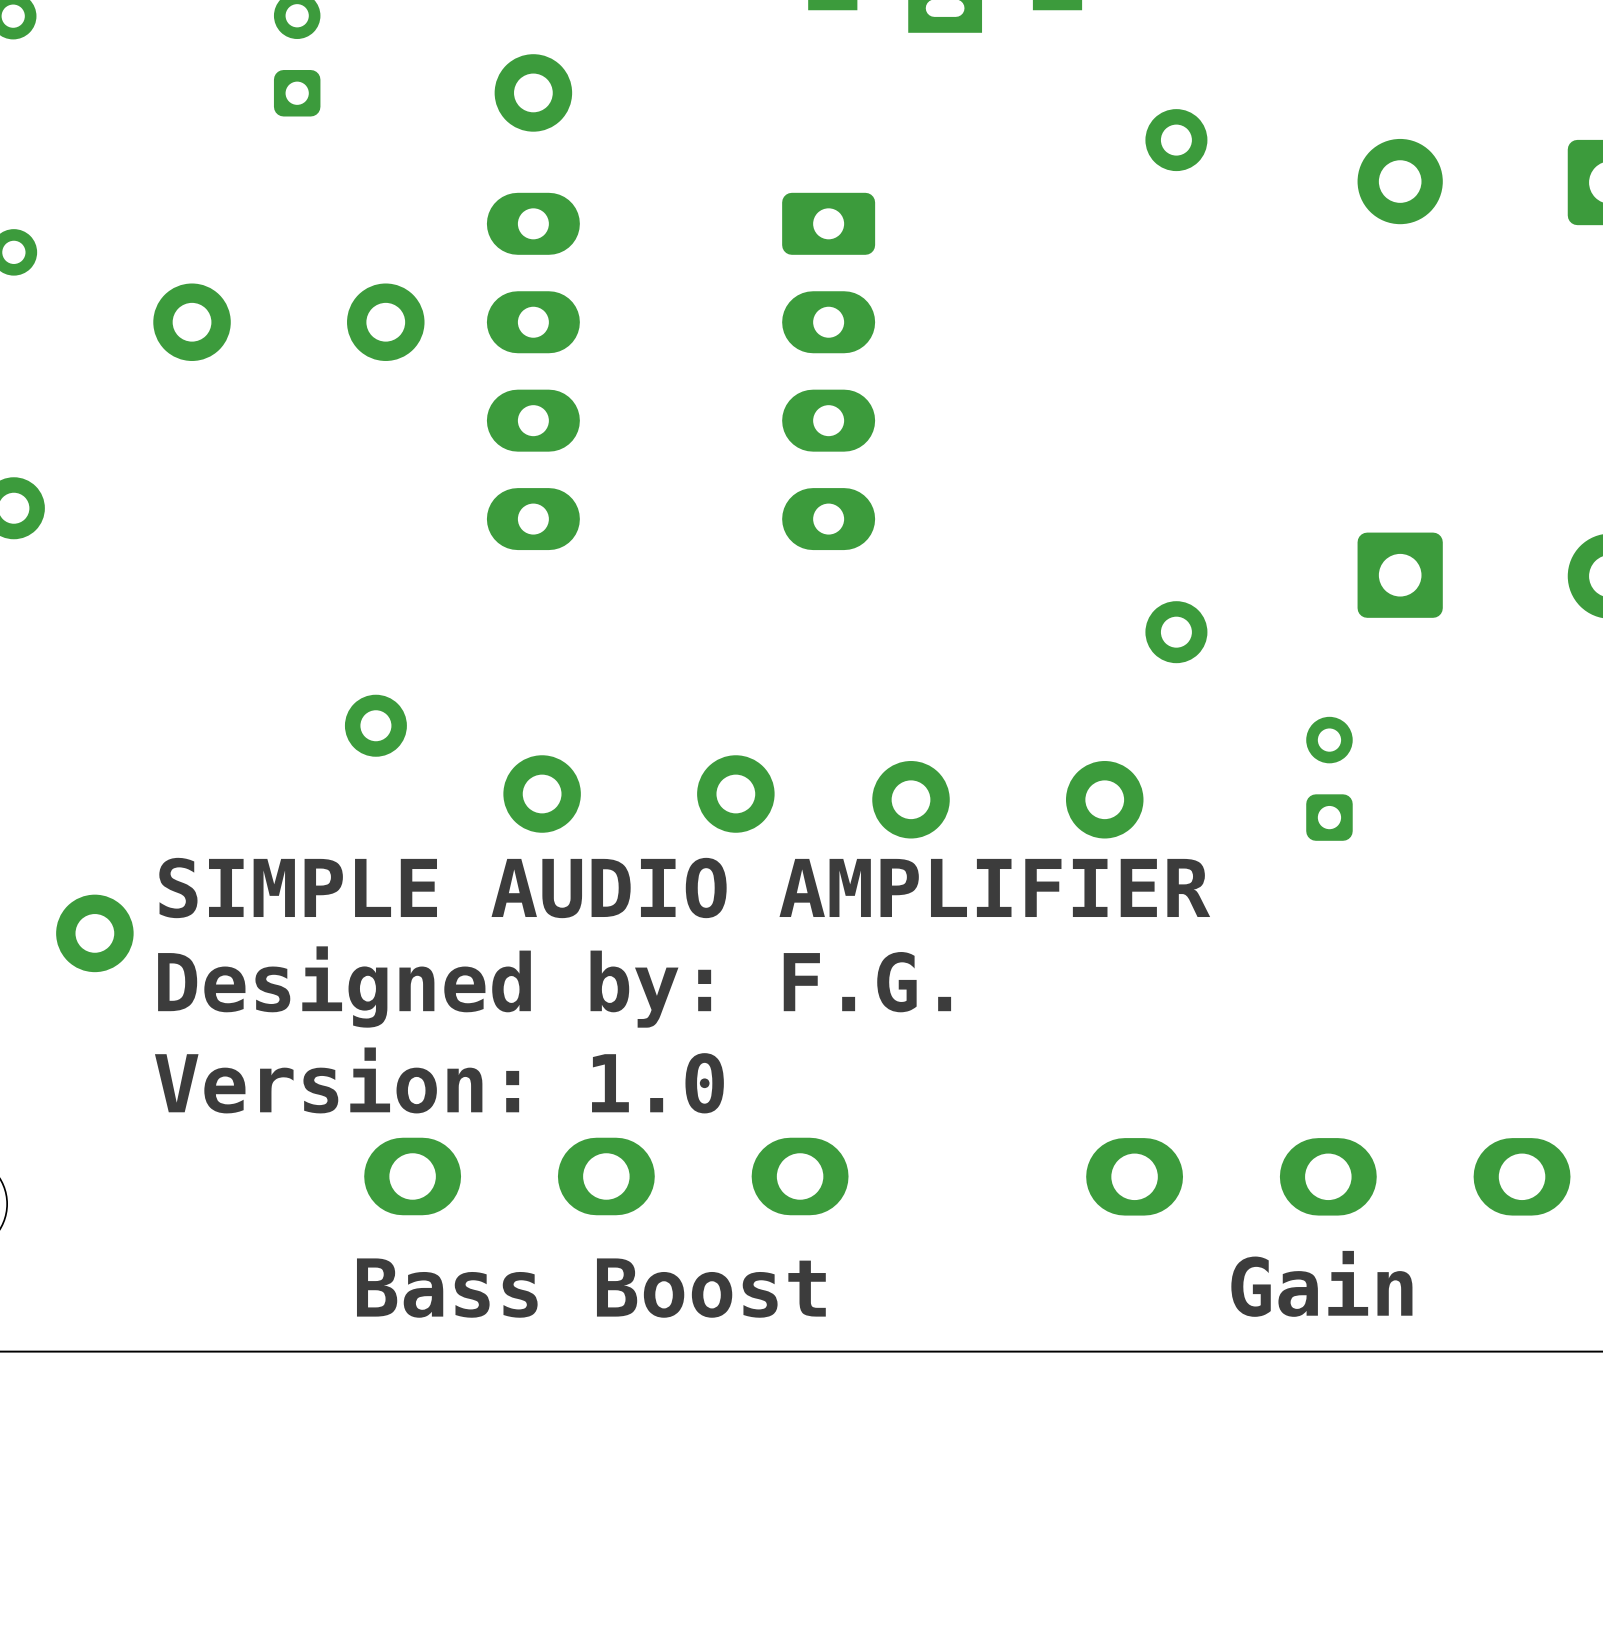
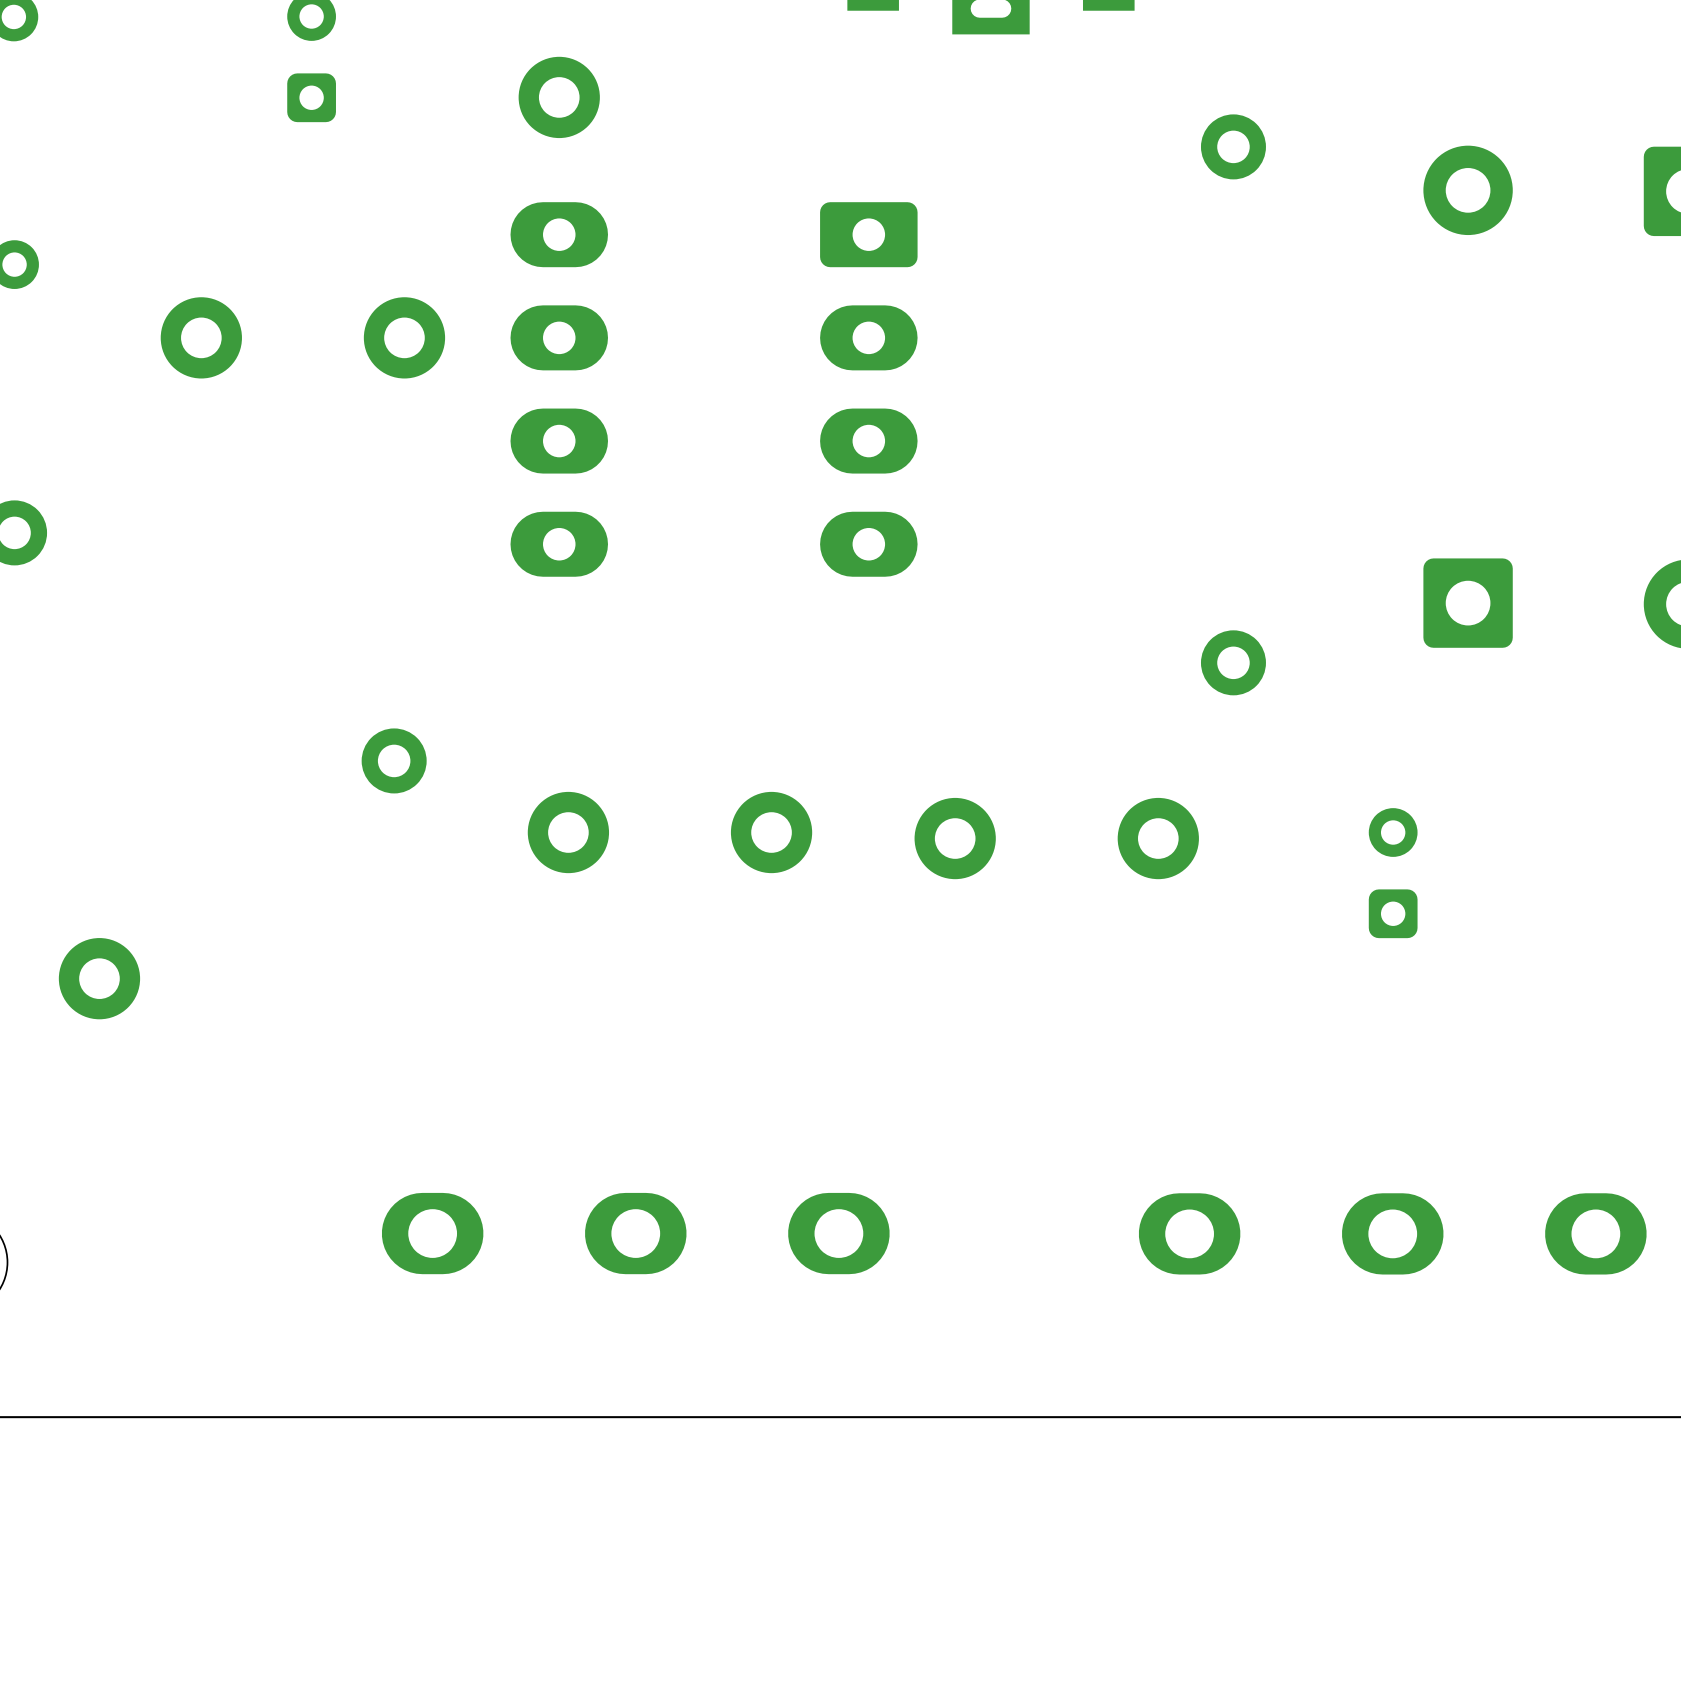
part position: (1329, 778) -> (1393, 873)
text: SIMPLE AUDIO AMPLIFIER (684, 887) -> none
text: Designed by: F.G. (554, 987) -> none
text: Version: 1.0 (439, 1080) -> none
text: Gain (1321, 1283) -> none
text: Bass Boost (591, 1288) -> none

